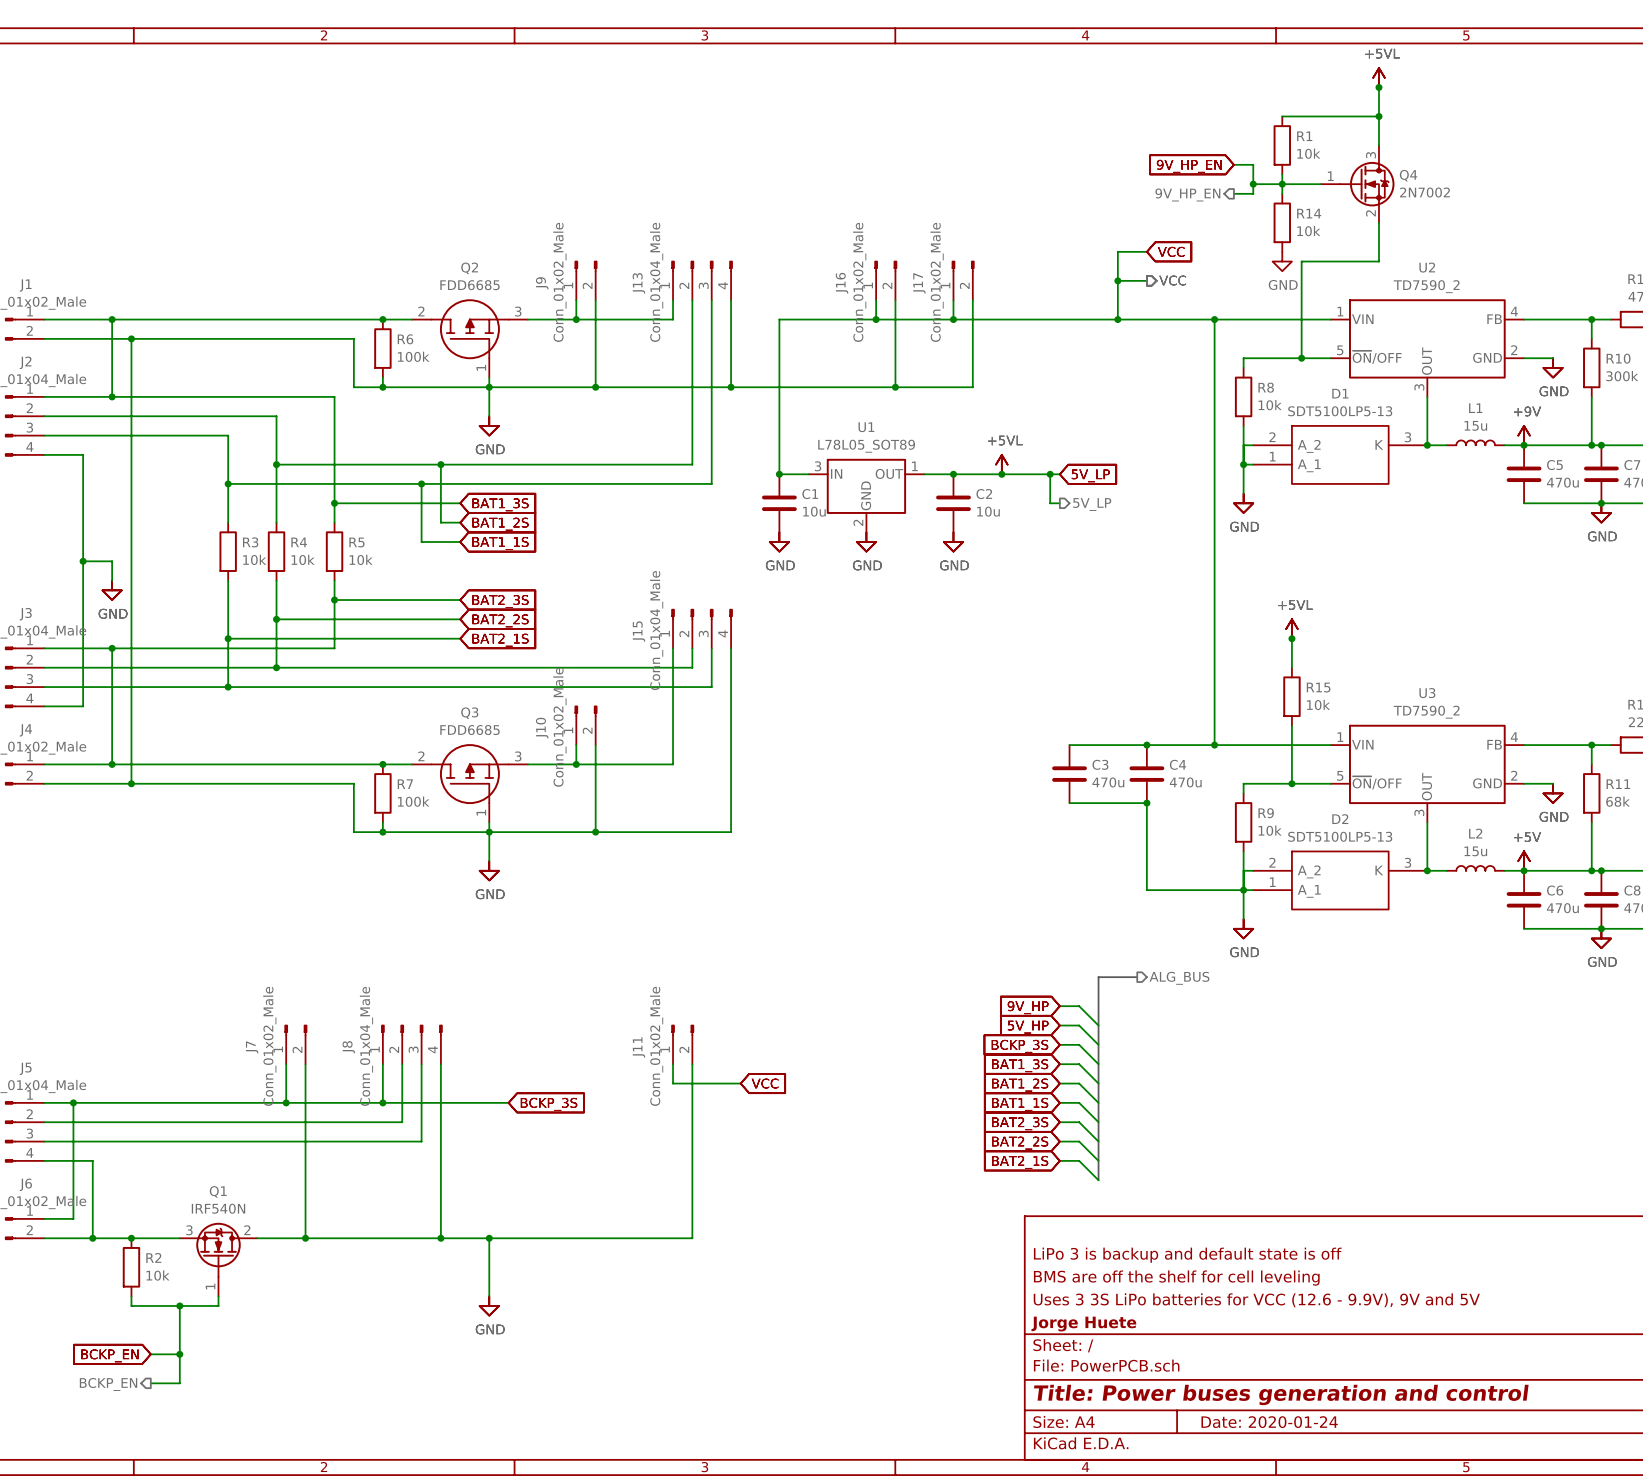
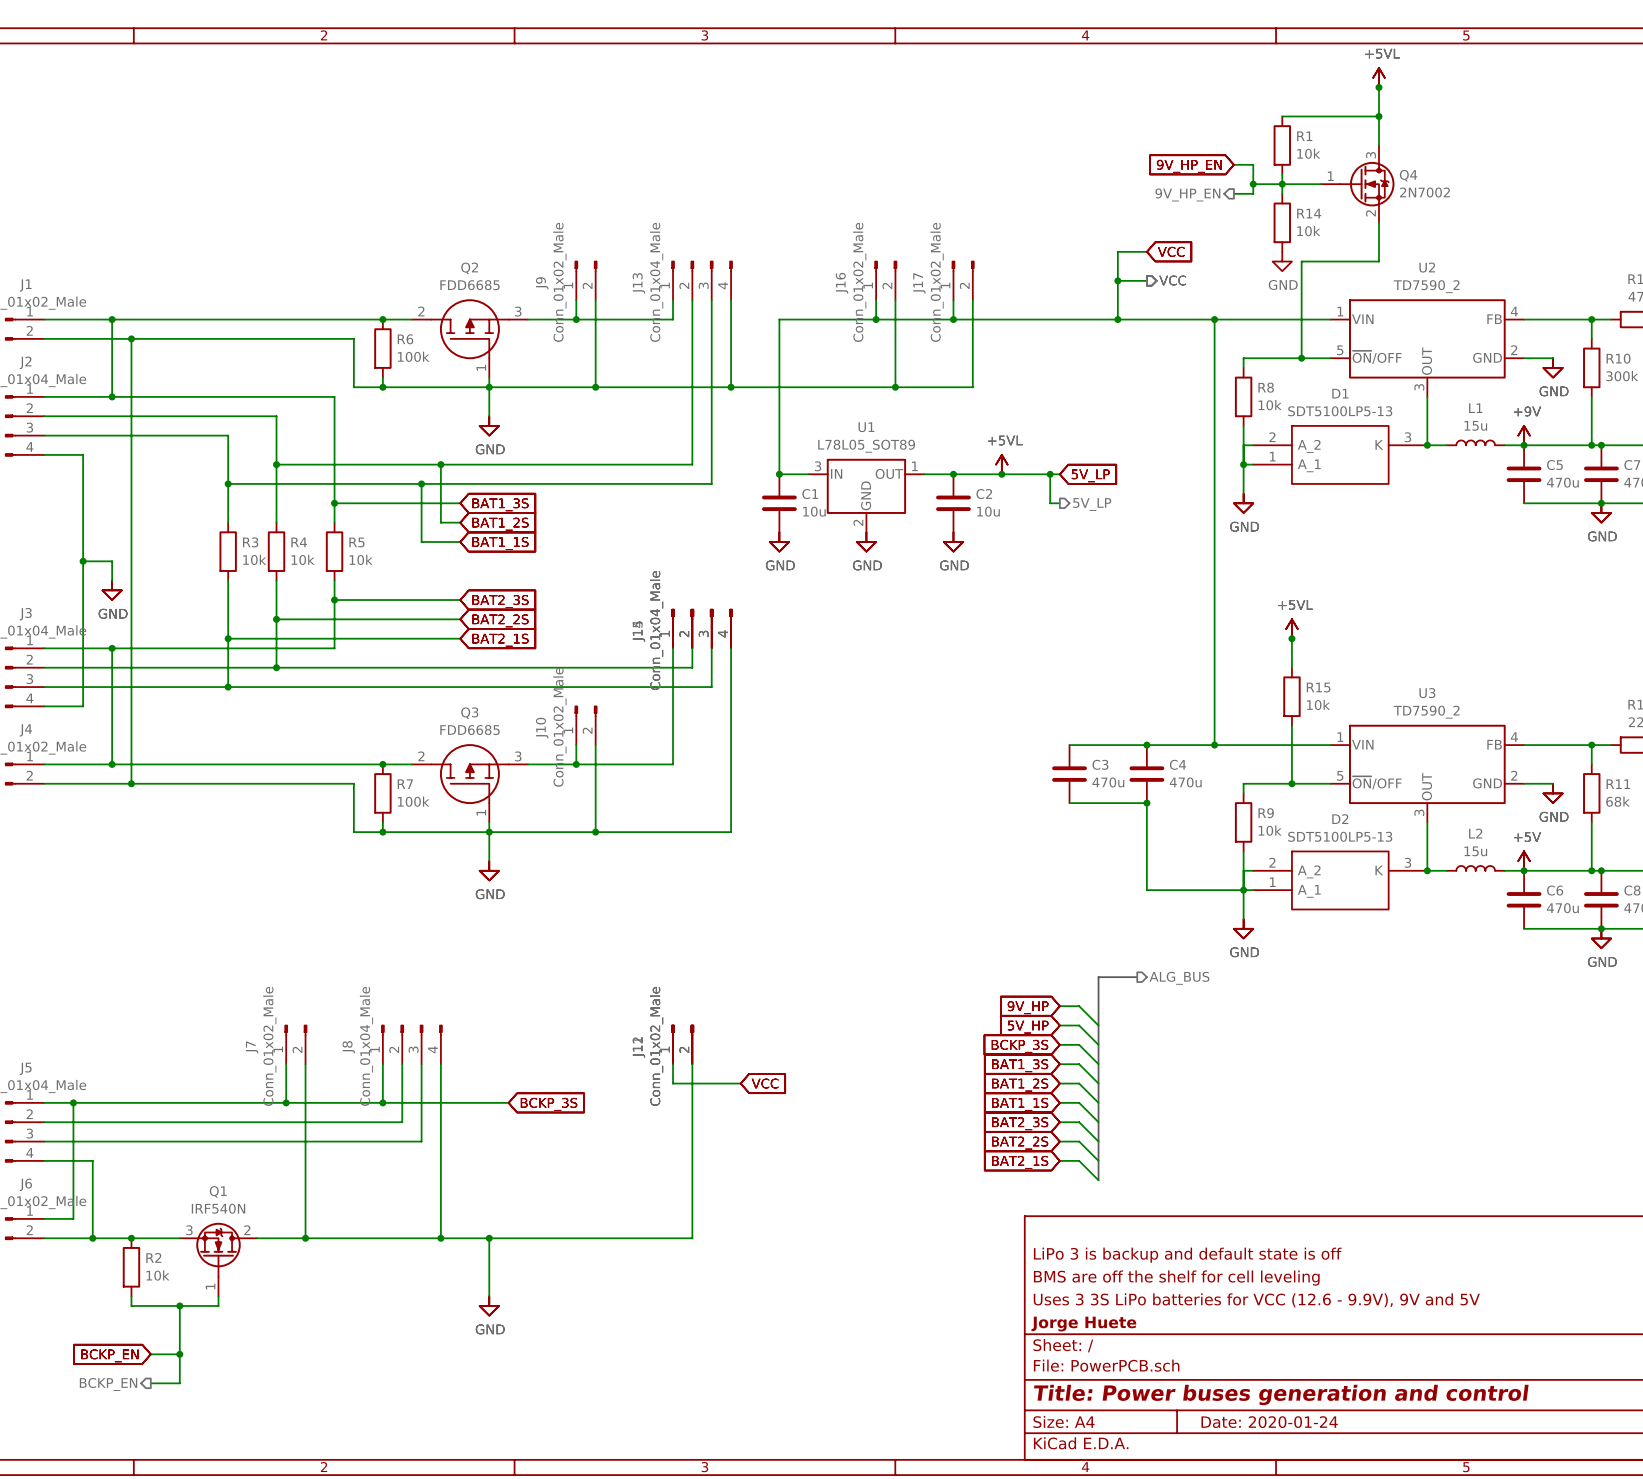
part: none -> Conn_01x04_Male (702, 628)
part: none -> Conn_01x02_Male (682, 1044)

